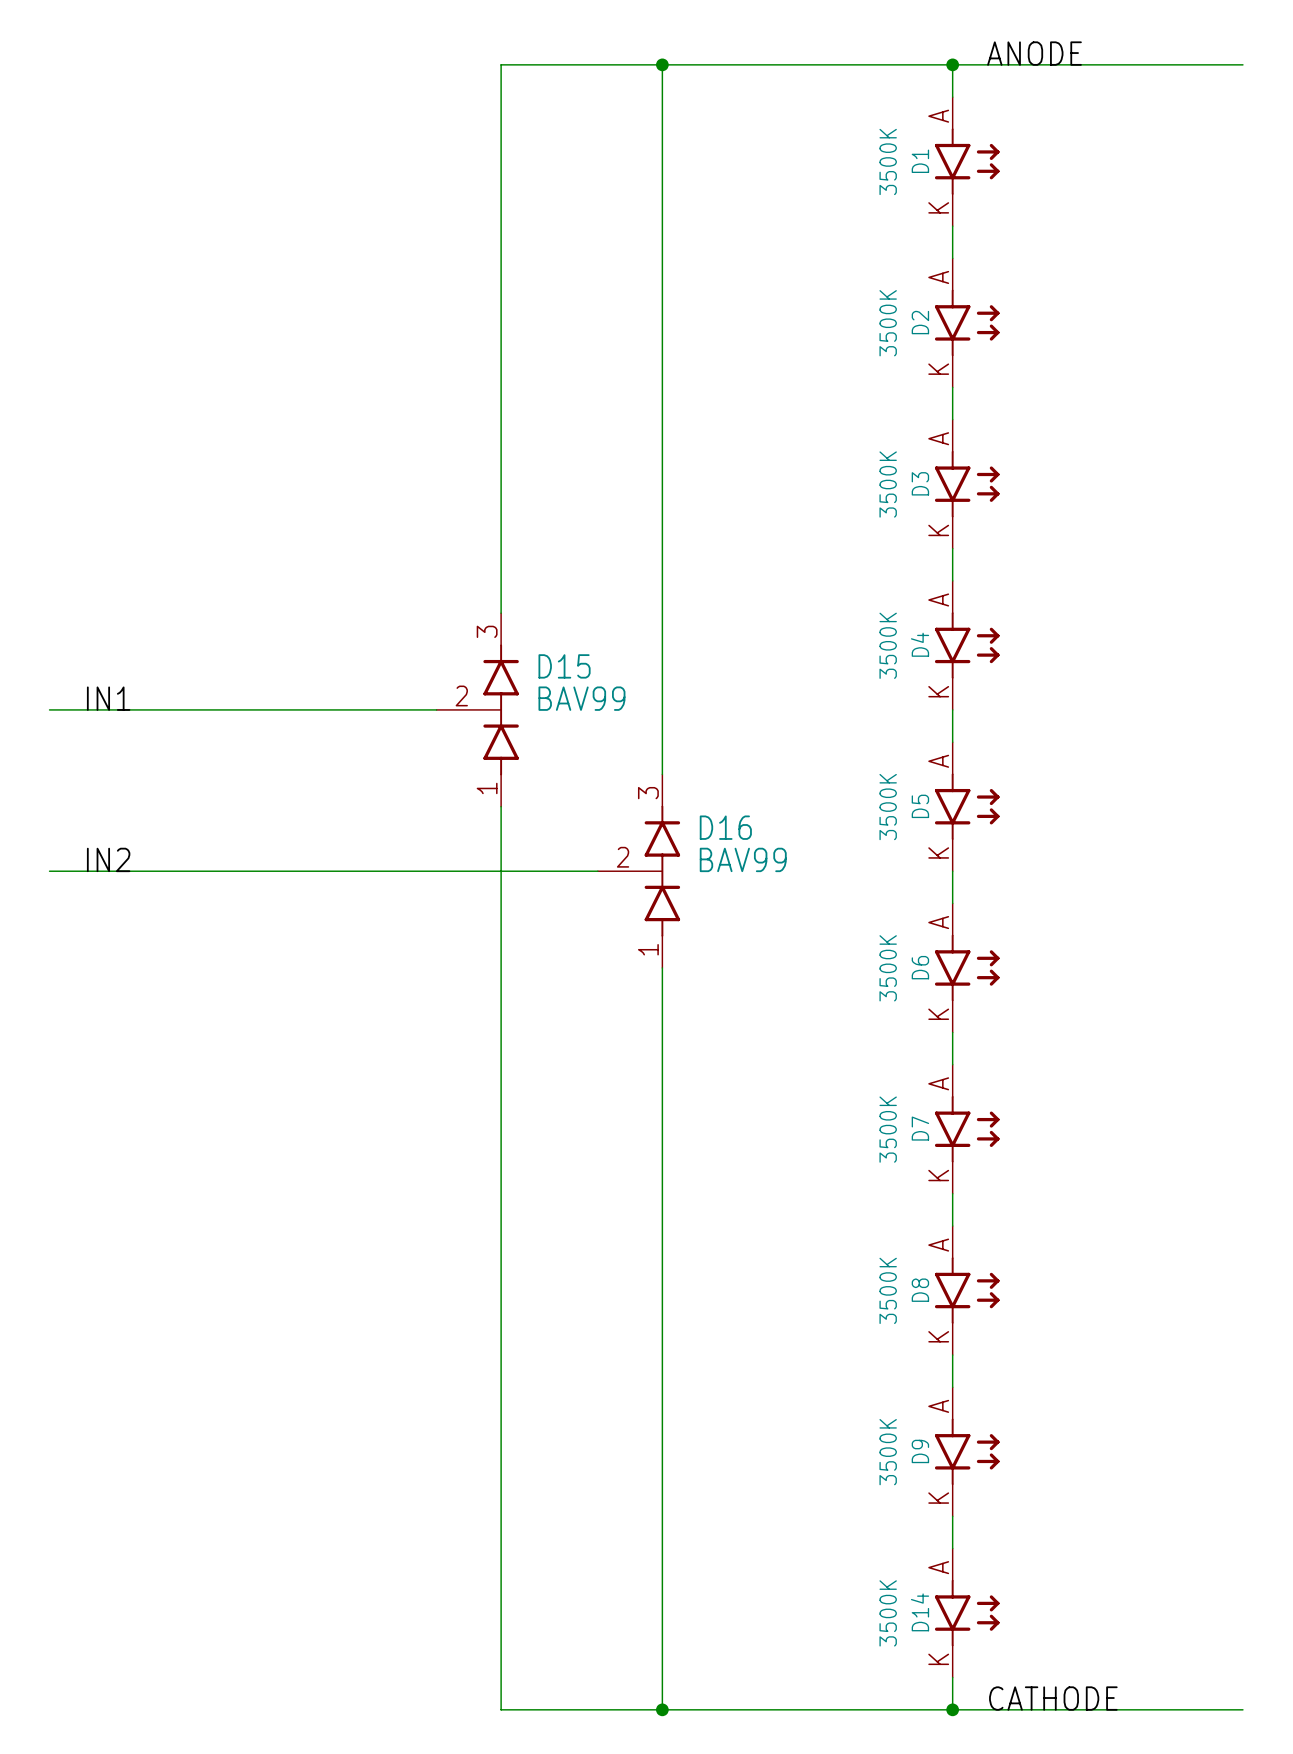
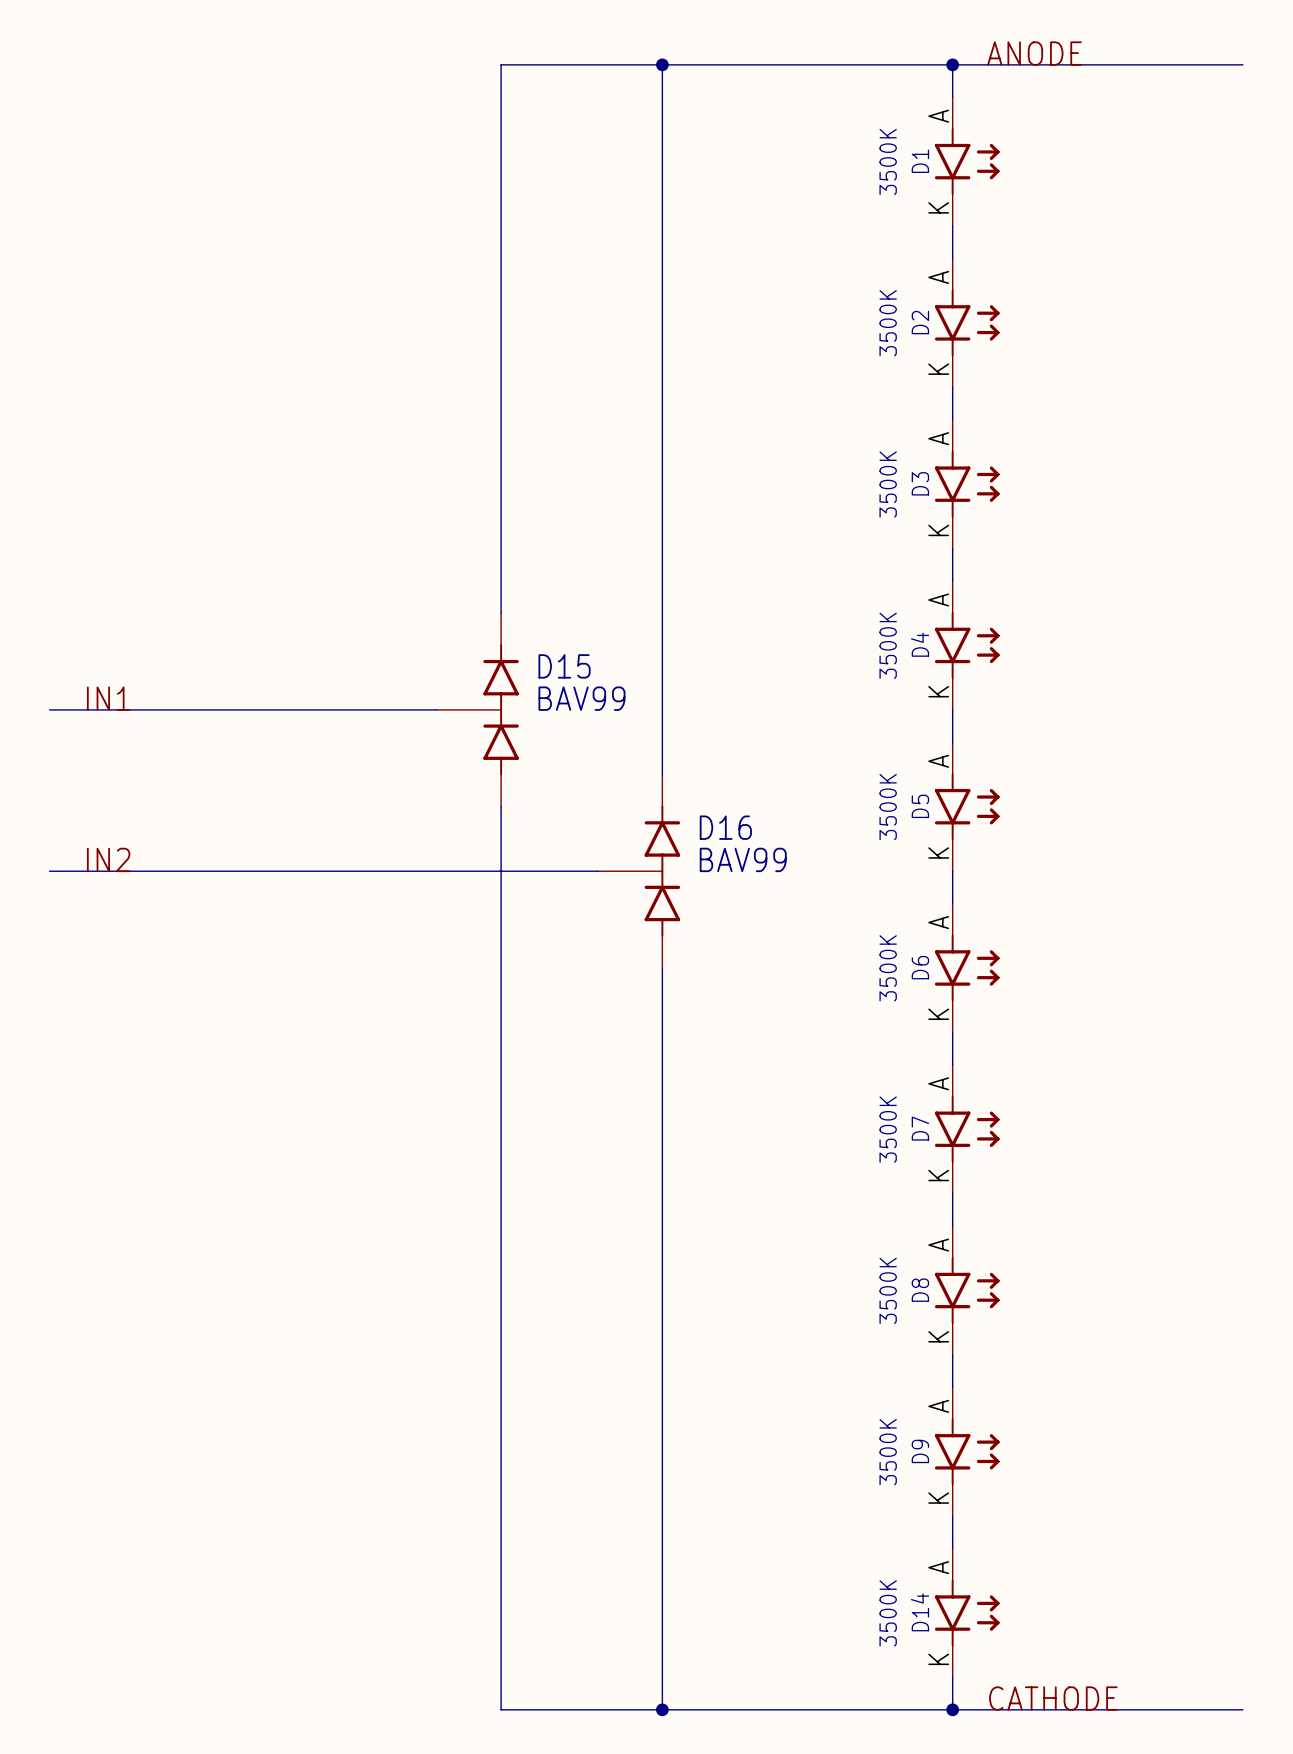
D15 pin number: 3 (487, 631) -> none
D15 pin number: 2 (461, 695) -> none
D15 pin number: 1 (487, 788) -> none
D16 pin number: 3 (648, 793) -> none
D16 pin number: 2 (623, 857) -> none
D16 pin number: 1 (648, 949) -> none

